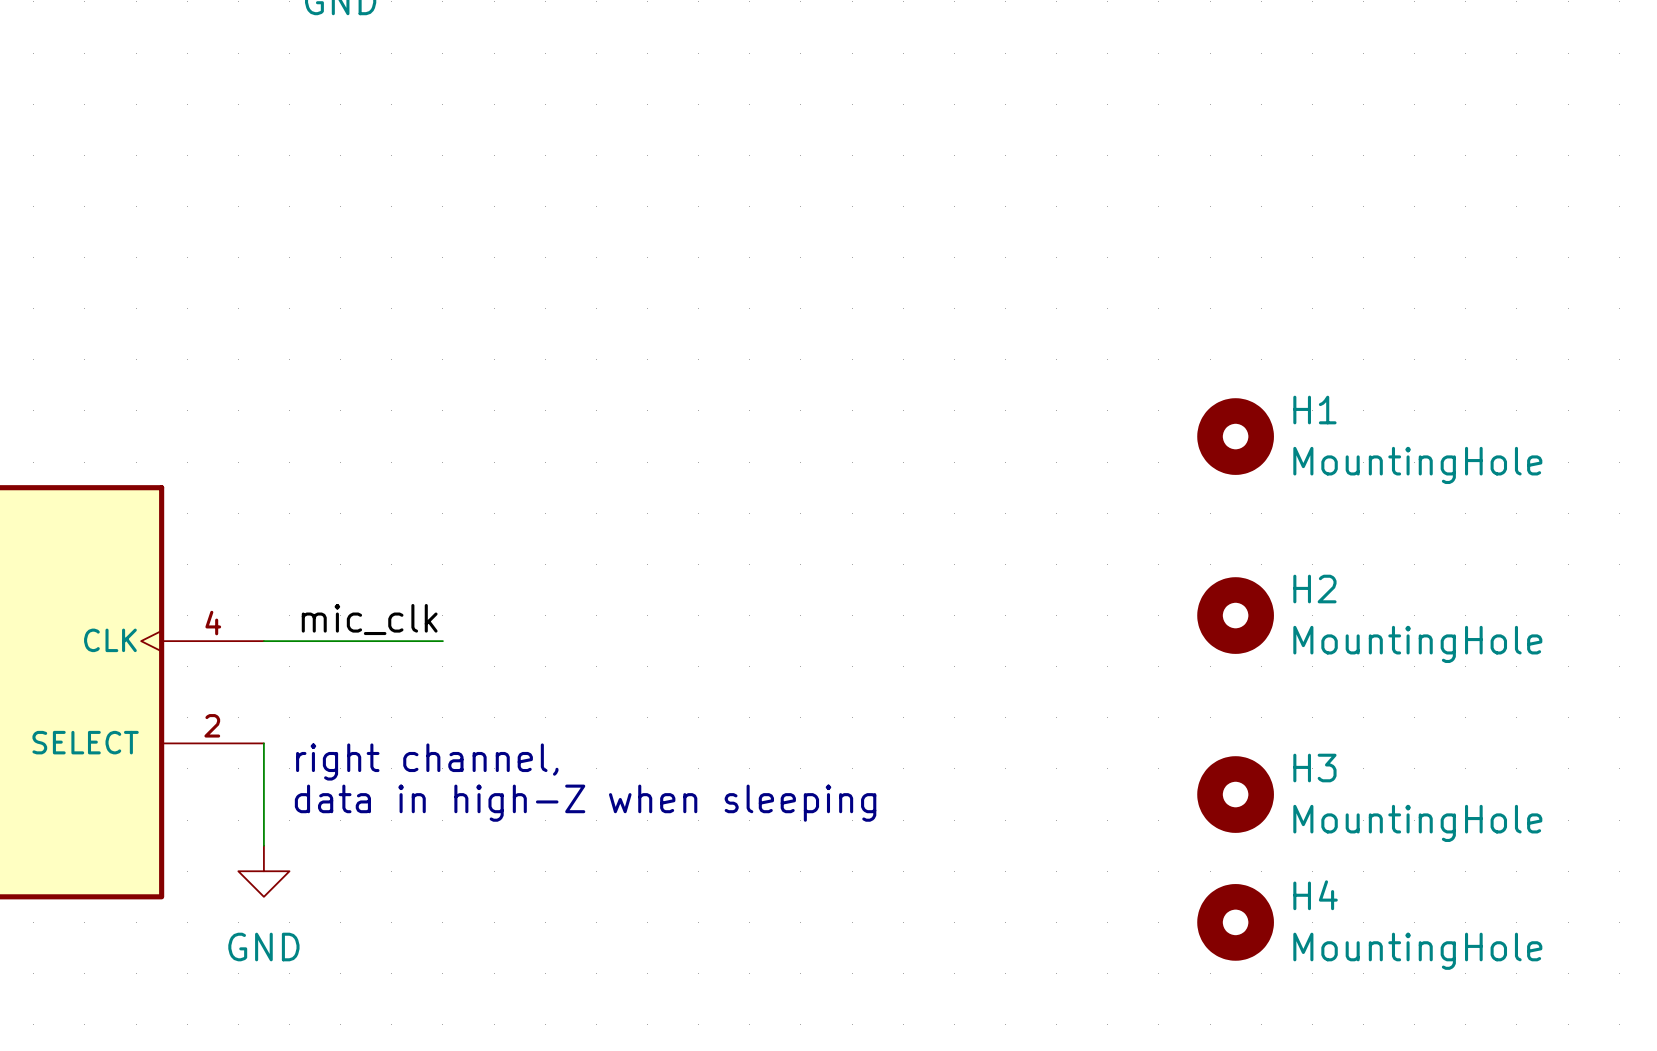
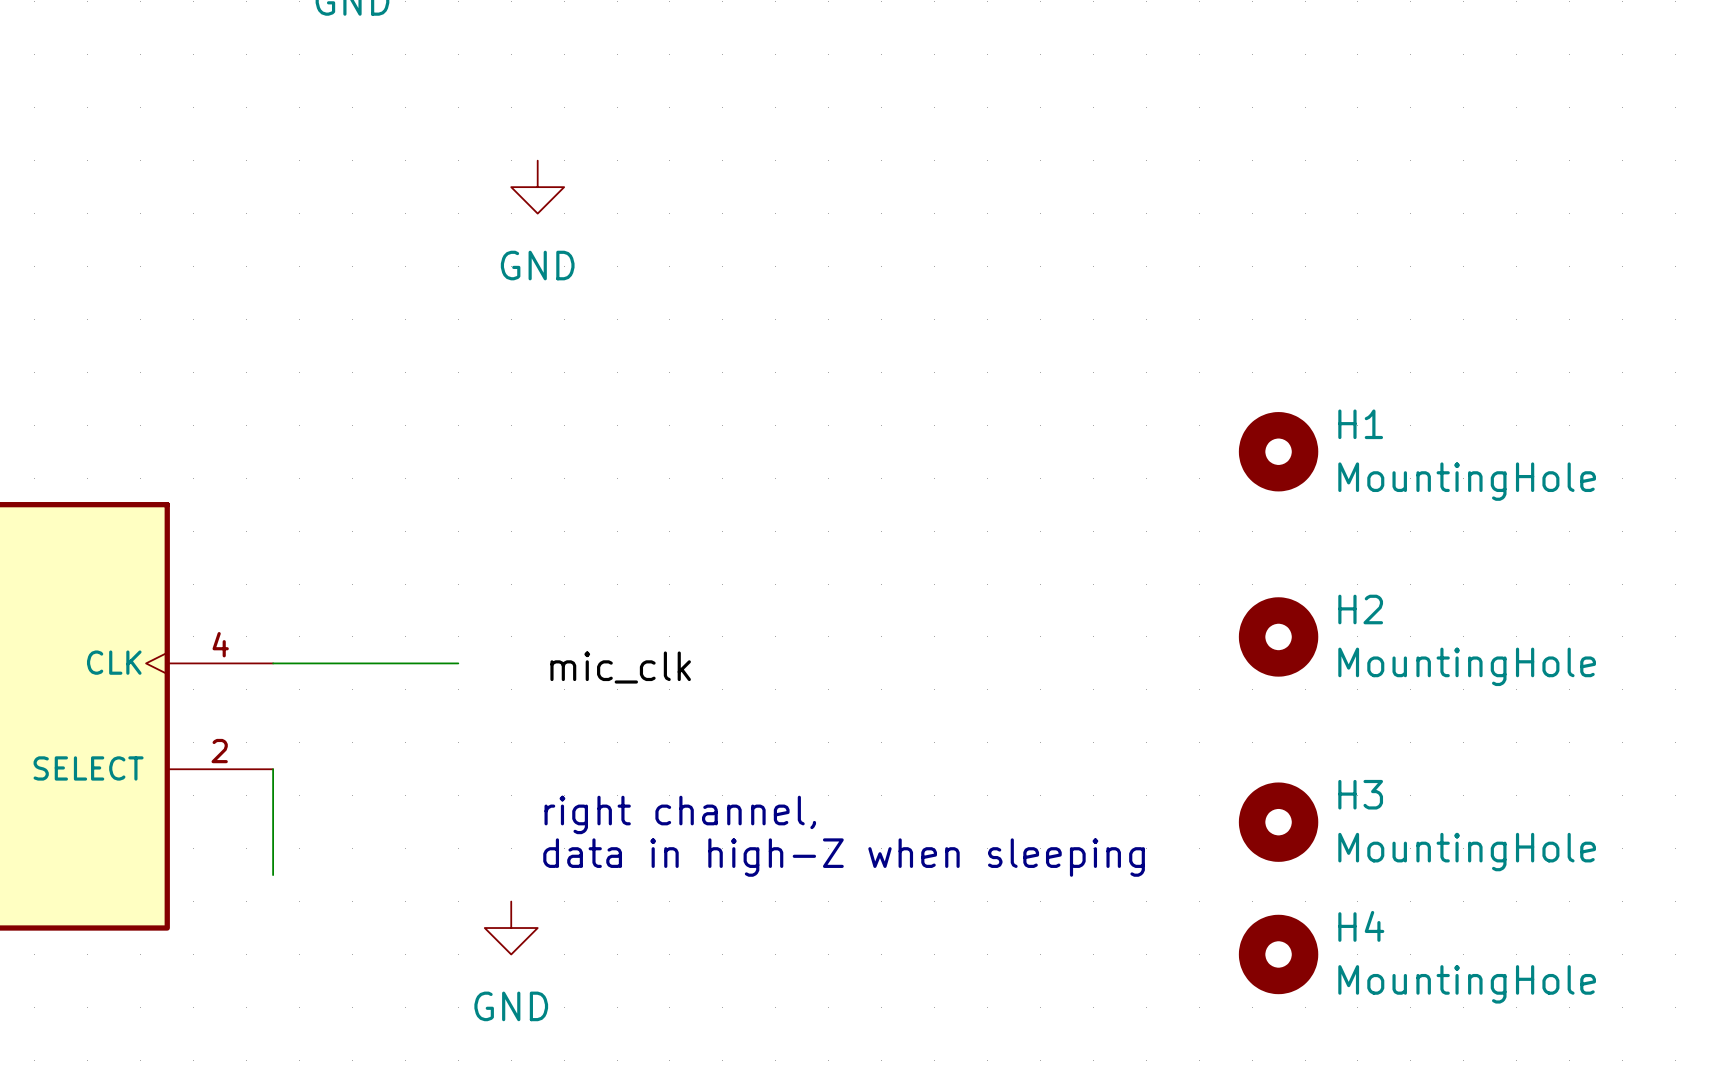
power symbol: none -> GND (537, 187)
label position: mic_clk (369, 619) -> mic_clk (620, 667)
text position: right channel, (427, 762) -> right channel, (680, 814)
text position: data in high-Z when sleeping (585, 803) -> data in high-Z when sleeping (844, 857)
power symbol position: GND (263, 871) -> GND (511, 928)

